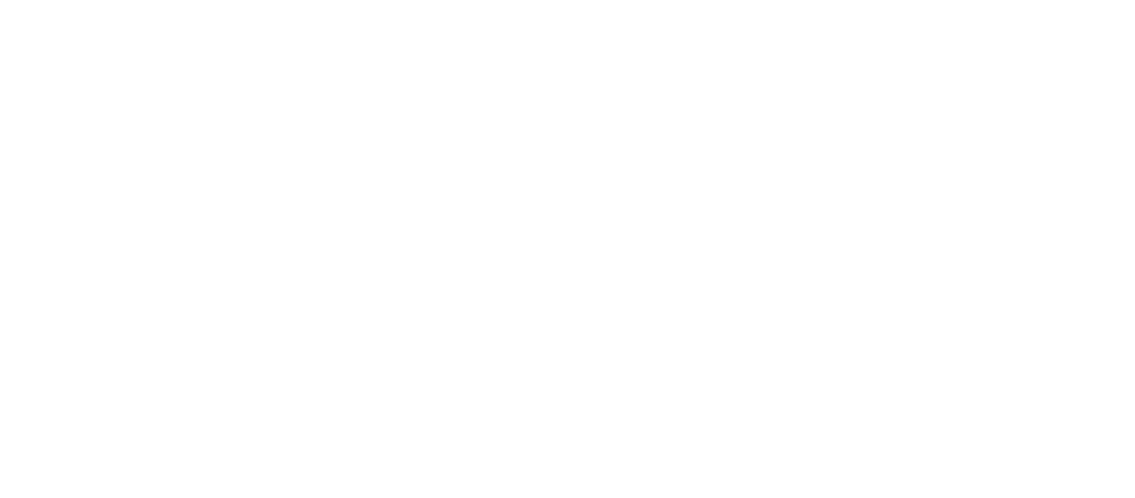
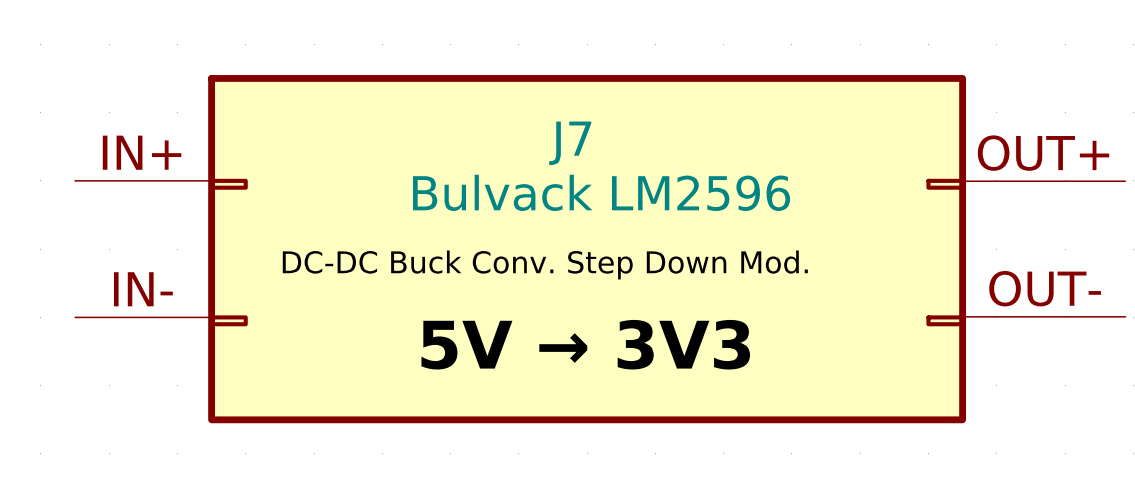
J7: none -> Bulvack LM2596 (600, 249)
label: none -> DC-DC Buck Conv. Step Down Mod. (545, 264)
label: none -> 5V → 3V3 (585, 344)

